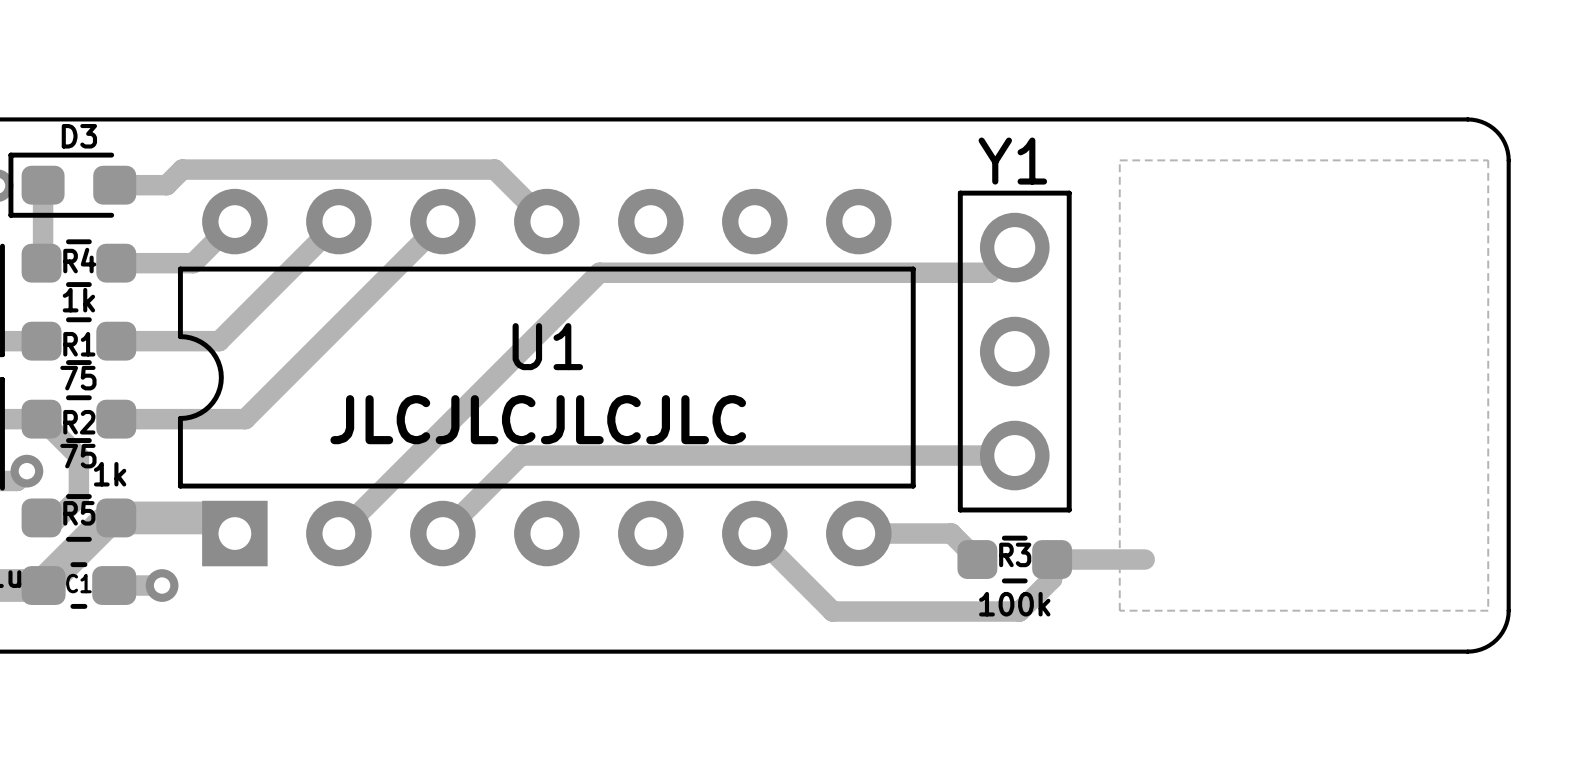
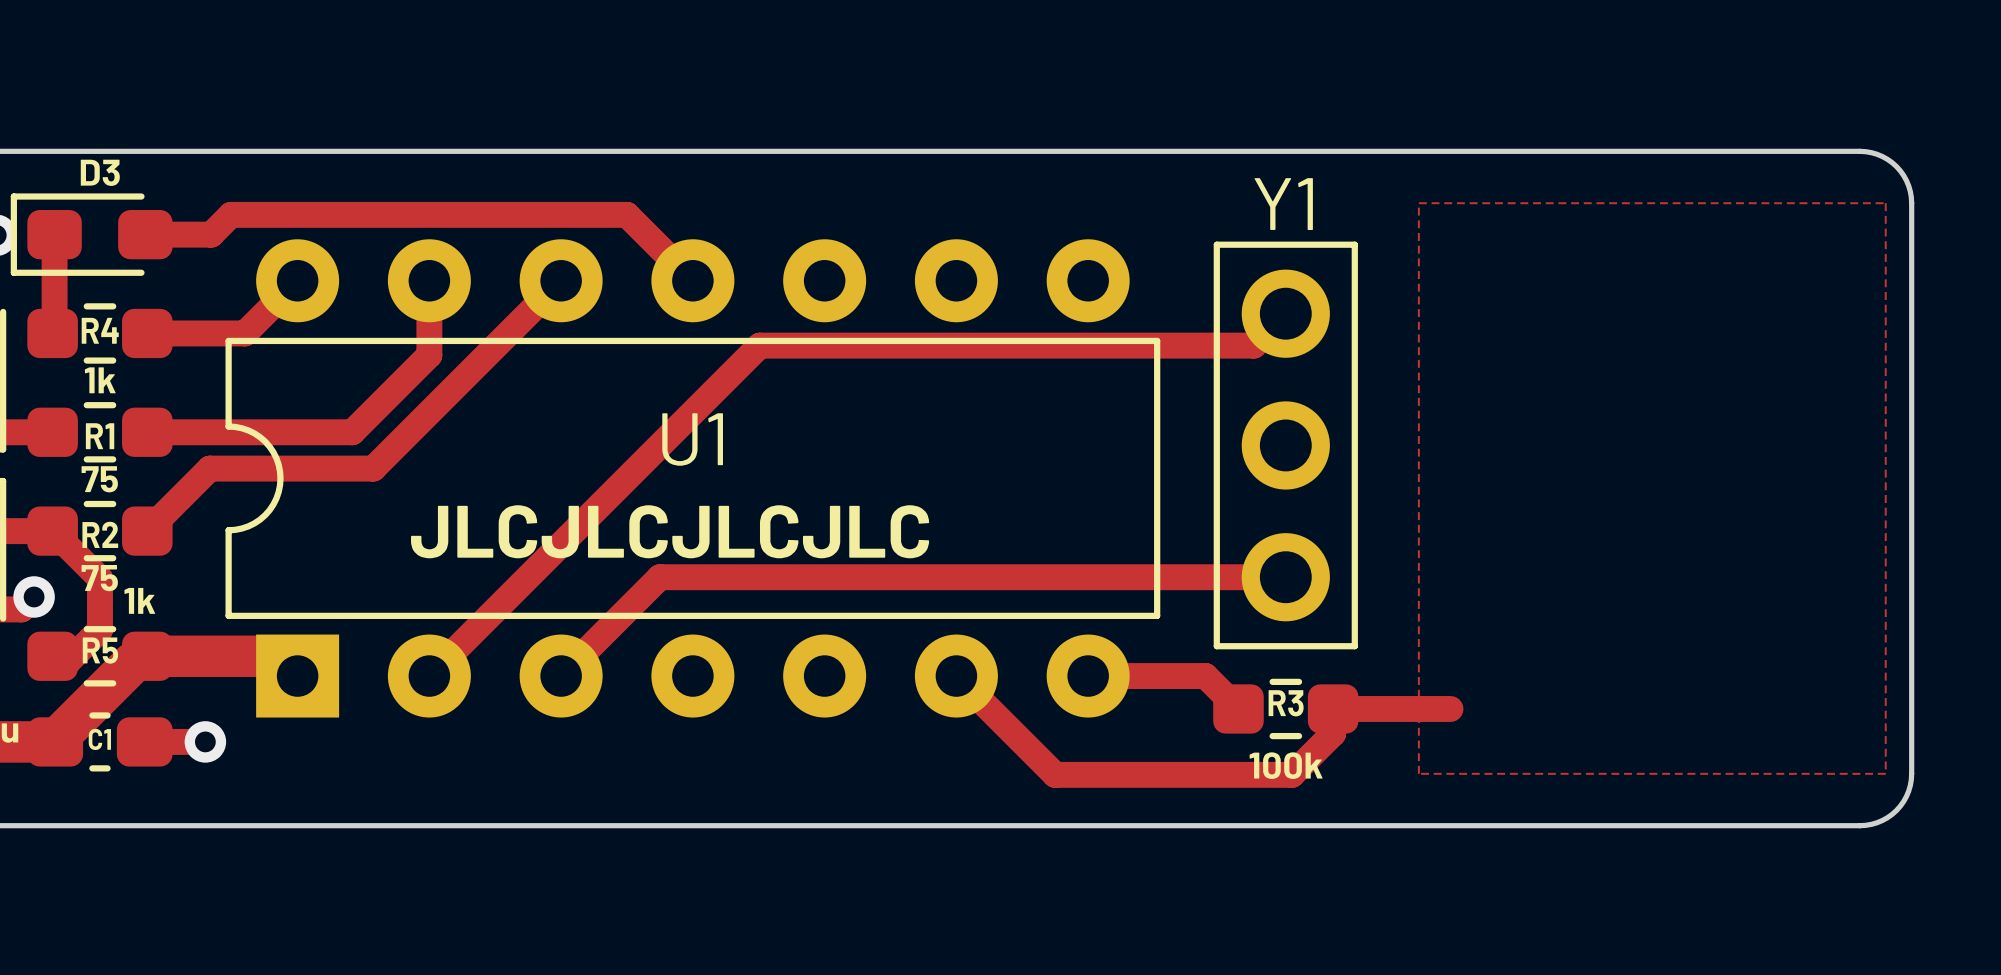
track: (338, 221) (219, 341) -> (429, 280) (429, 355) (352, 432) (277, 432)
track: (294, 369) (245, 419) (116, 419) -> (373, 468) (209, 468) (147, 531)

